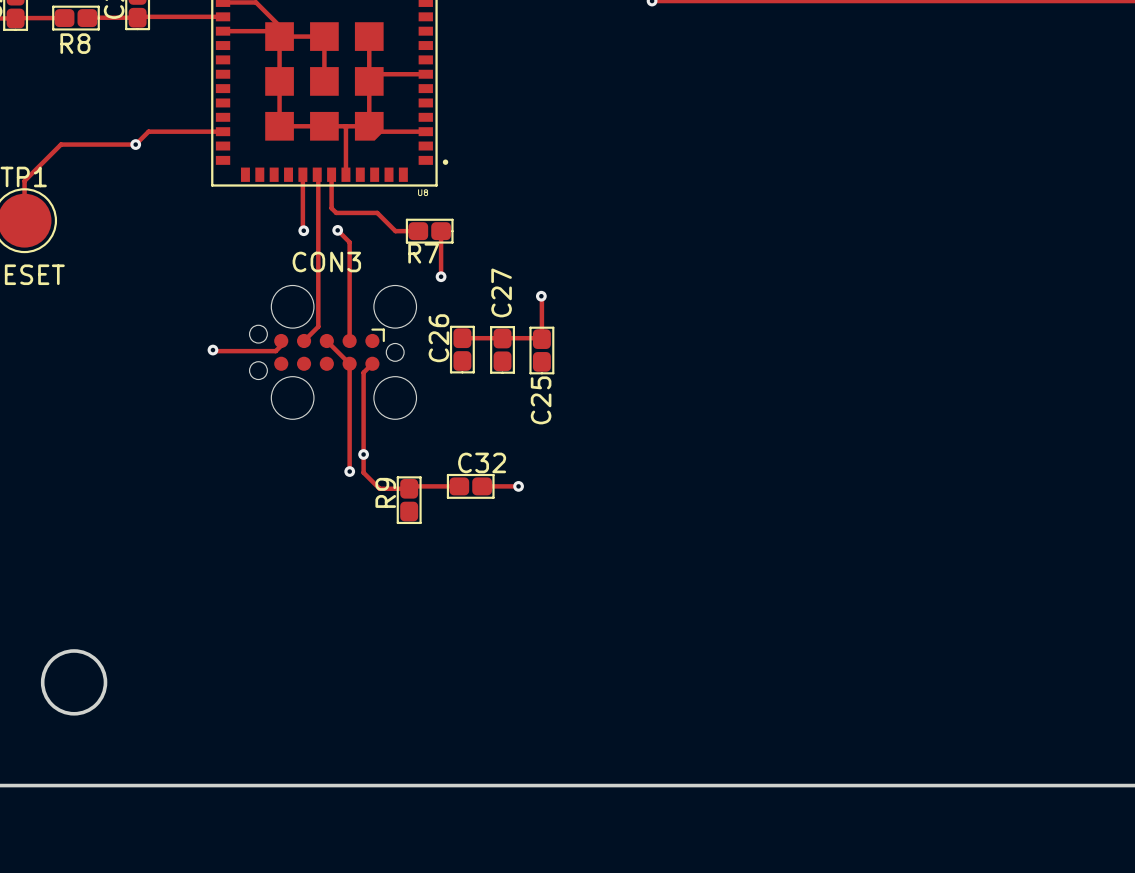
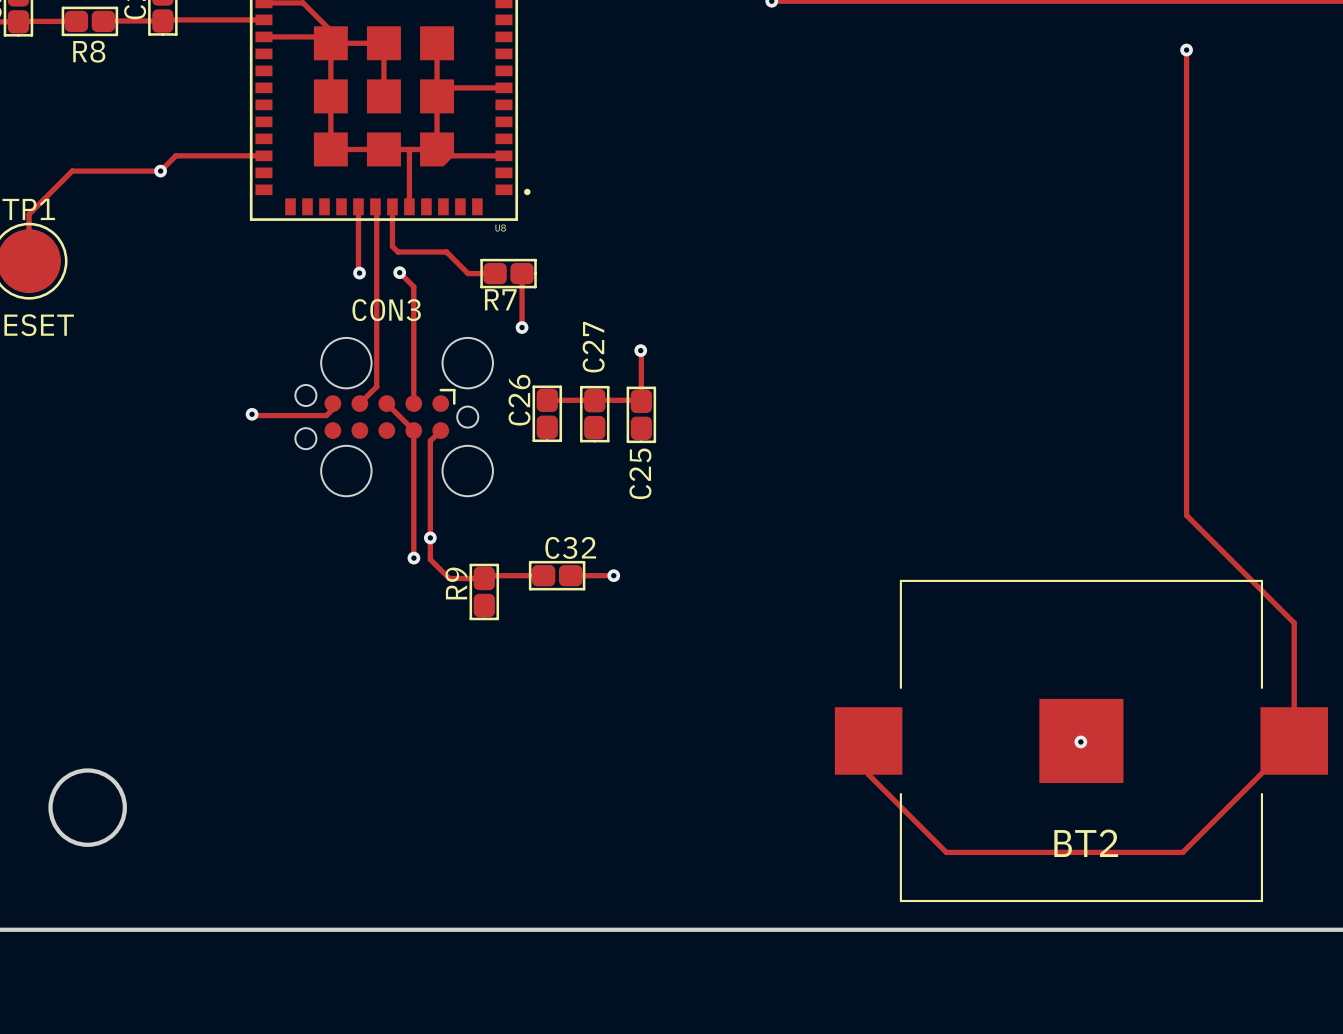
track: none -> (1186, 50) (1186, 515) (1294, 623) (1294, 740) (1182, 852) (946, 852) (868, 774) (868, 740)
via: none -> (1186, 50)
BT2: none -> (1081, 740)
via: none -> (1080, 741)

